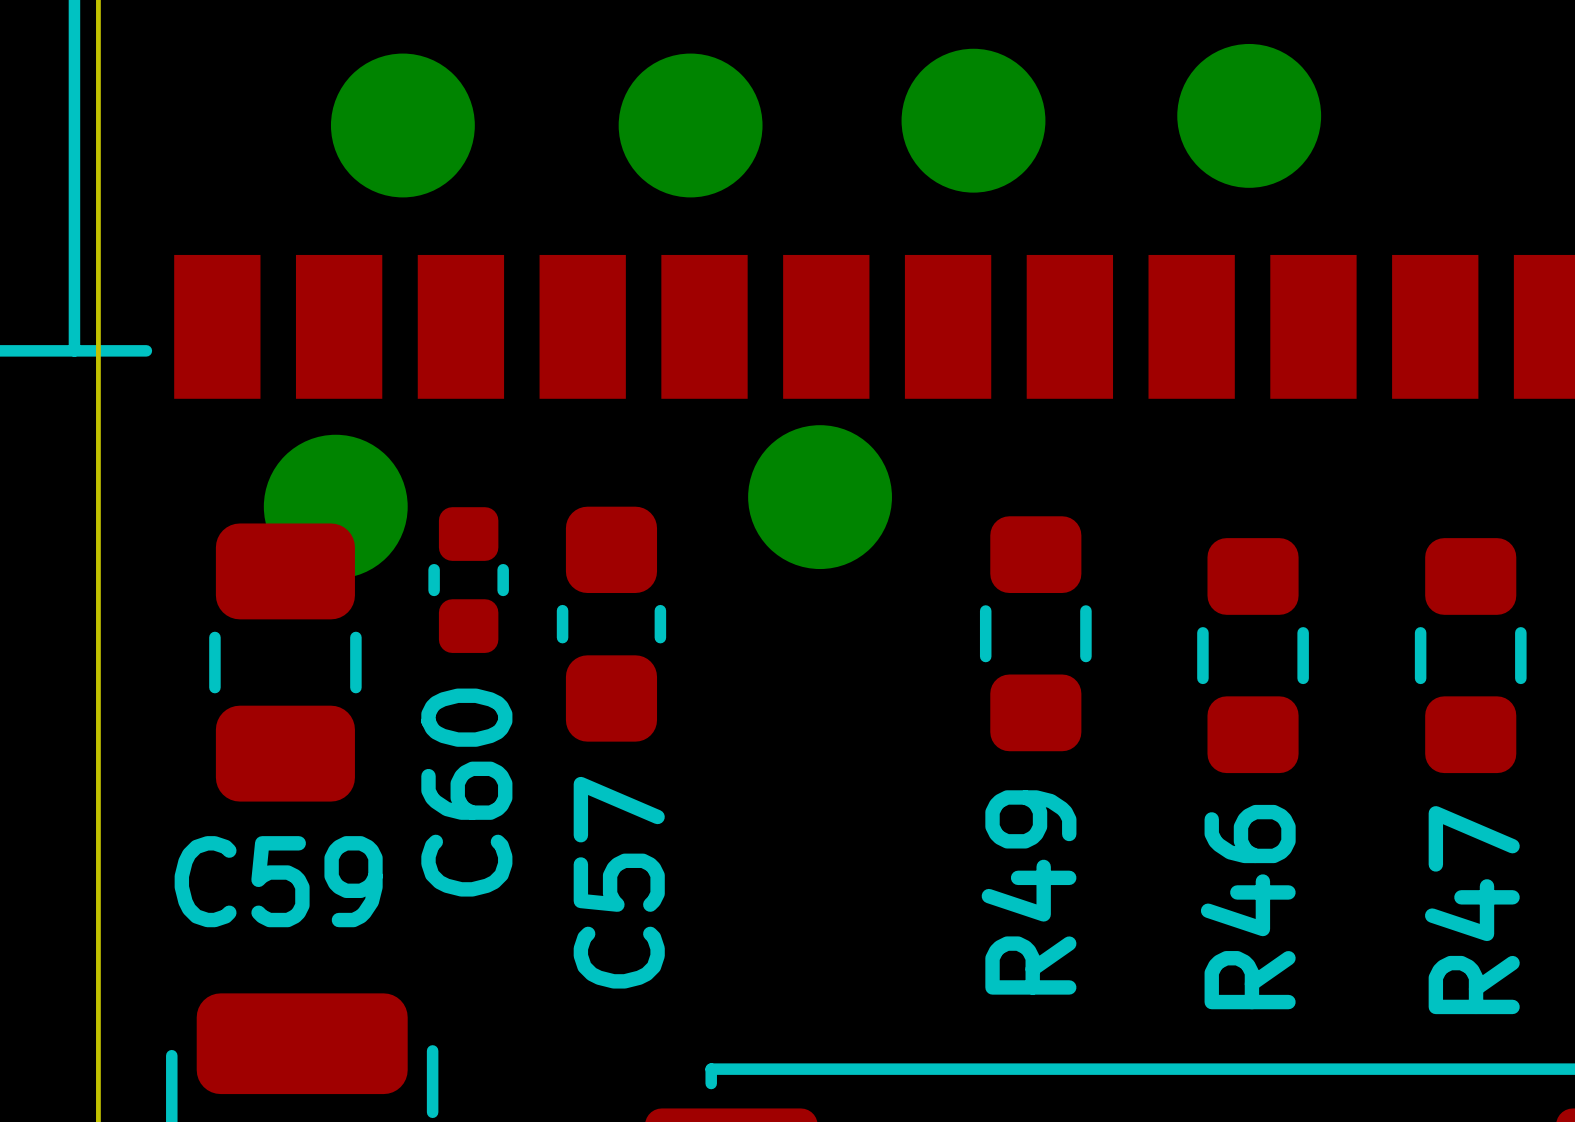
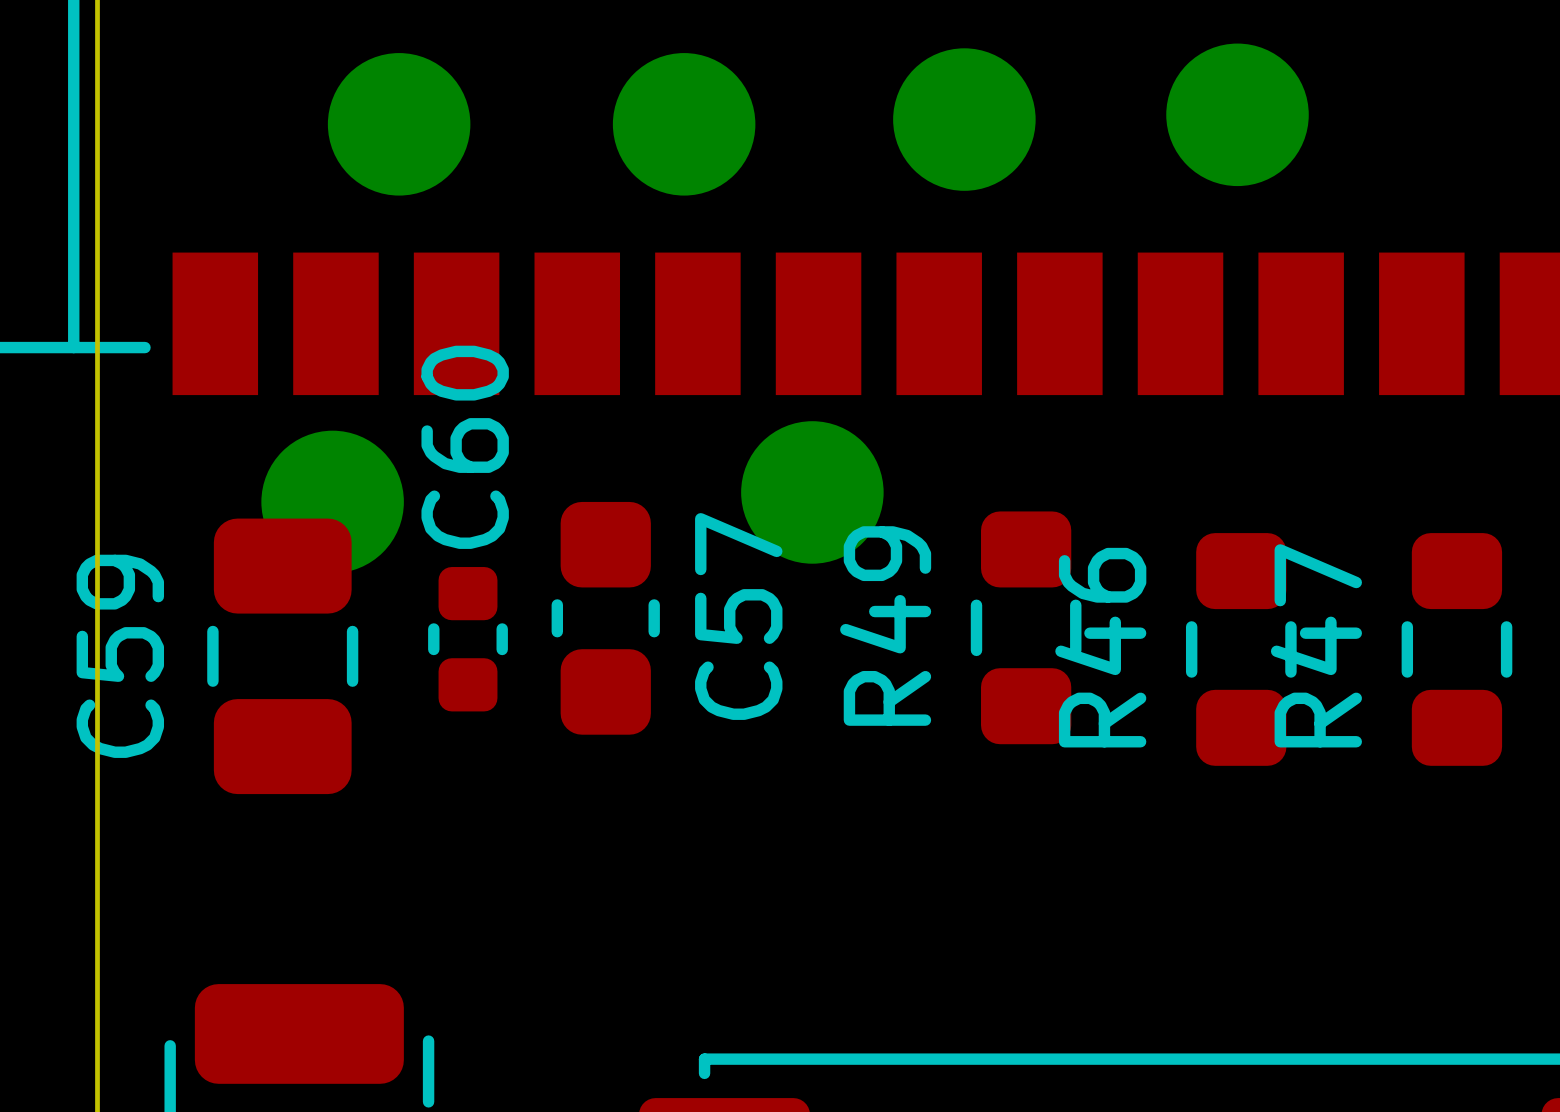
C60 position: (468, 580) -> (468, 639)
C60 name position: C60 (466, 792) -> C60 (465, 447)
C59 name rotation: 0° (278, 881) -> 90° counterclockwise (120, 656)
C59 name position: C59 (278, 881) -> C59 (120, 656)
C57 name position: C57 (619, 882) -> C57 (738, 616)
R49 name position: R49 (1029, 892) -> R49 (885, 626)
R46 name position: R46 (1248, 907) -> R46 (1100, 647)
R47 name position: R47 (1472, 910) -> R47 (1316, 645)

